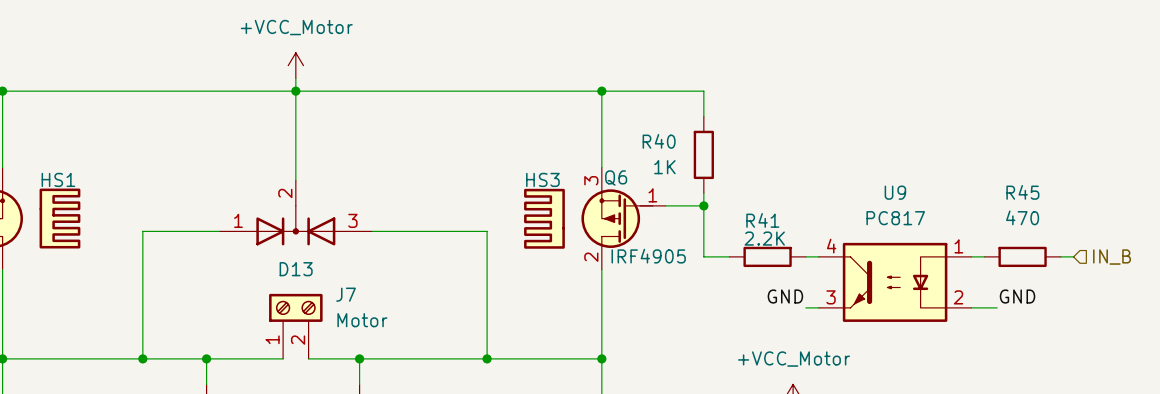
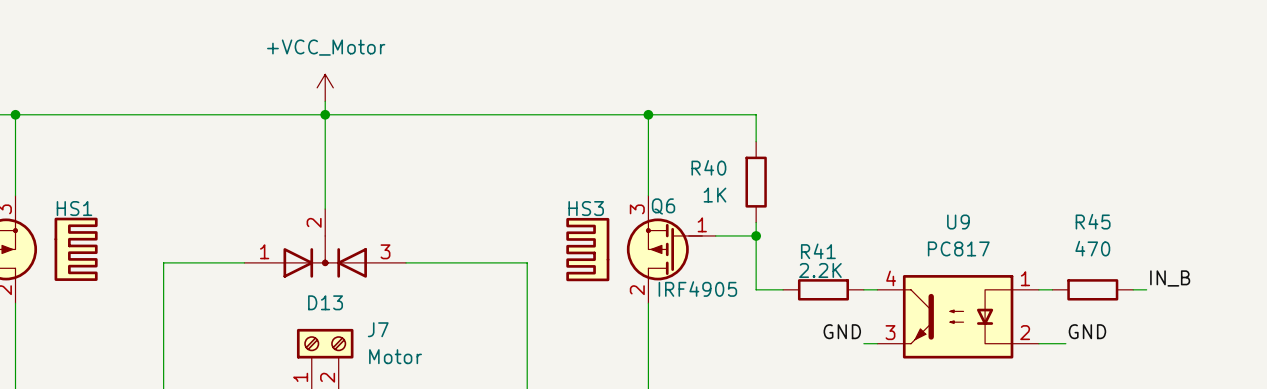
label: none -> IN_B (1170, 278)
hierarchical label: IN_B (1112, 257) -> none

